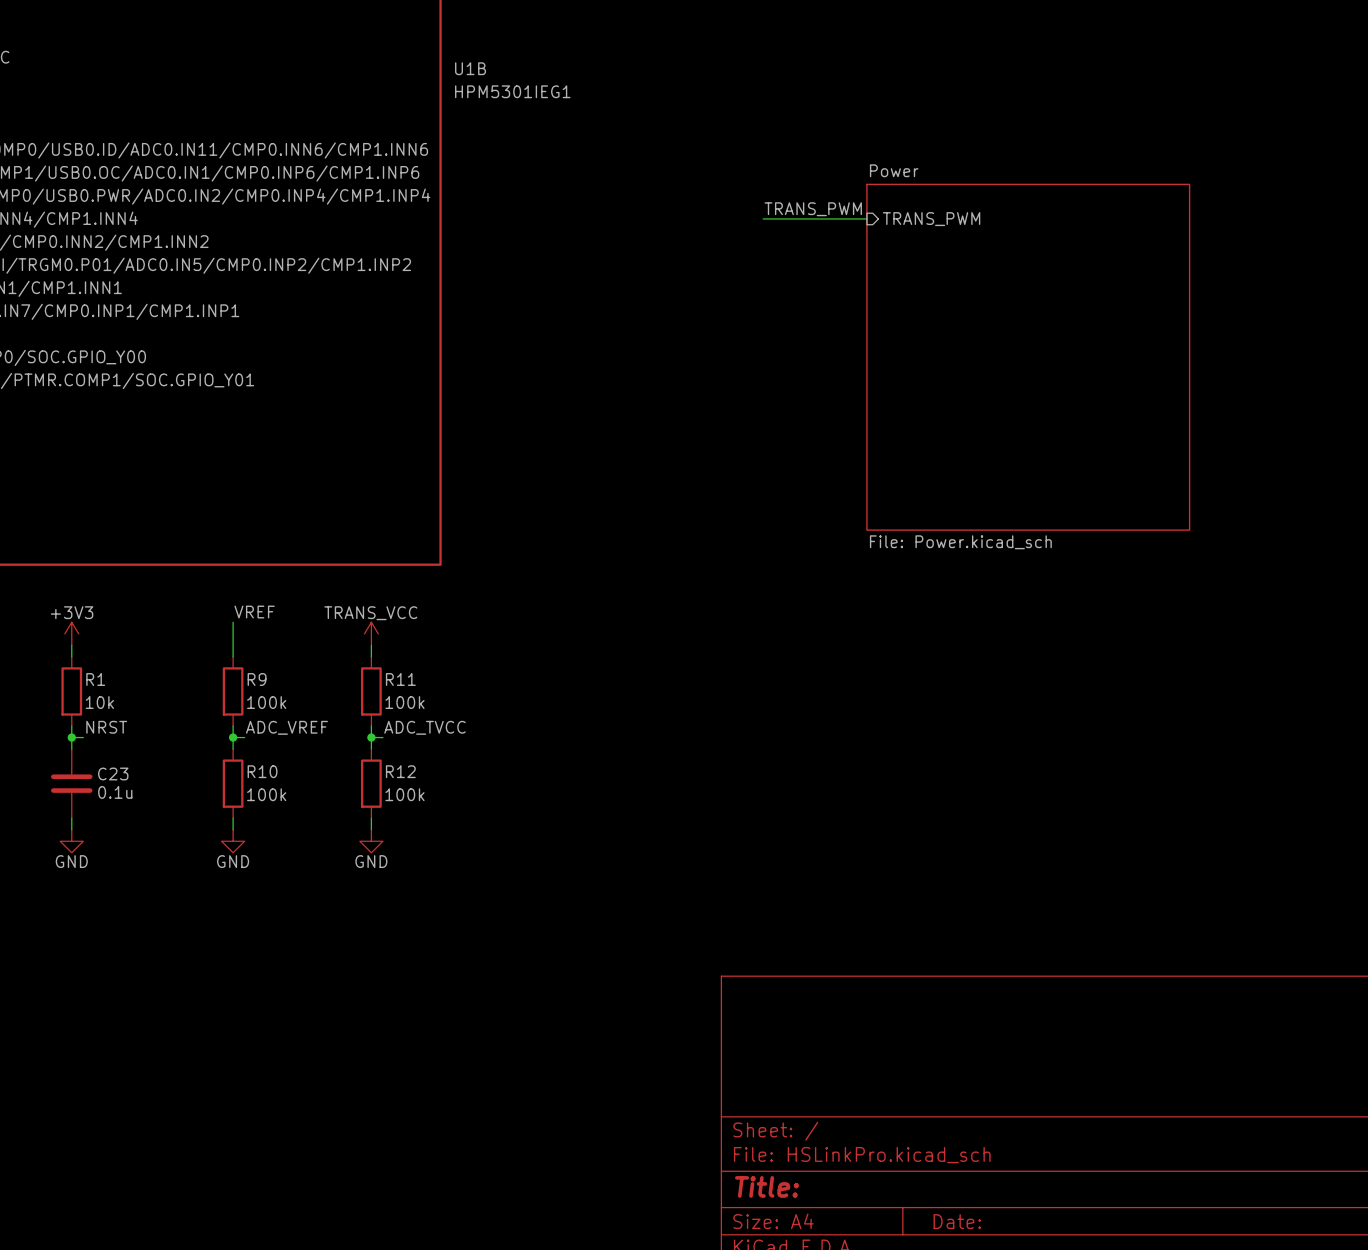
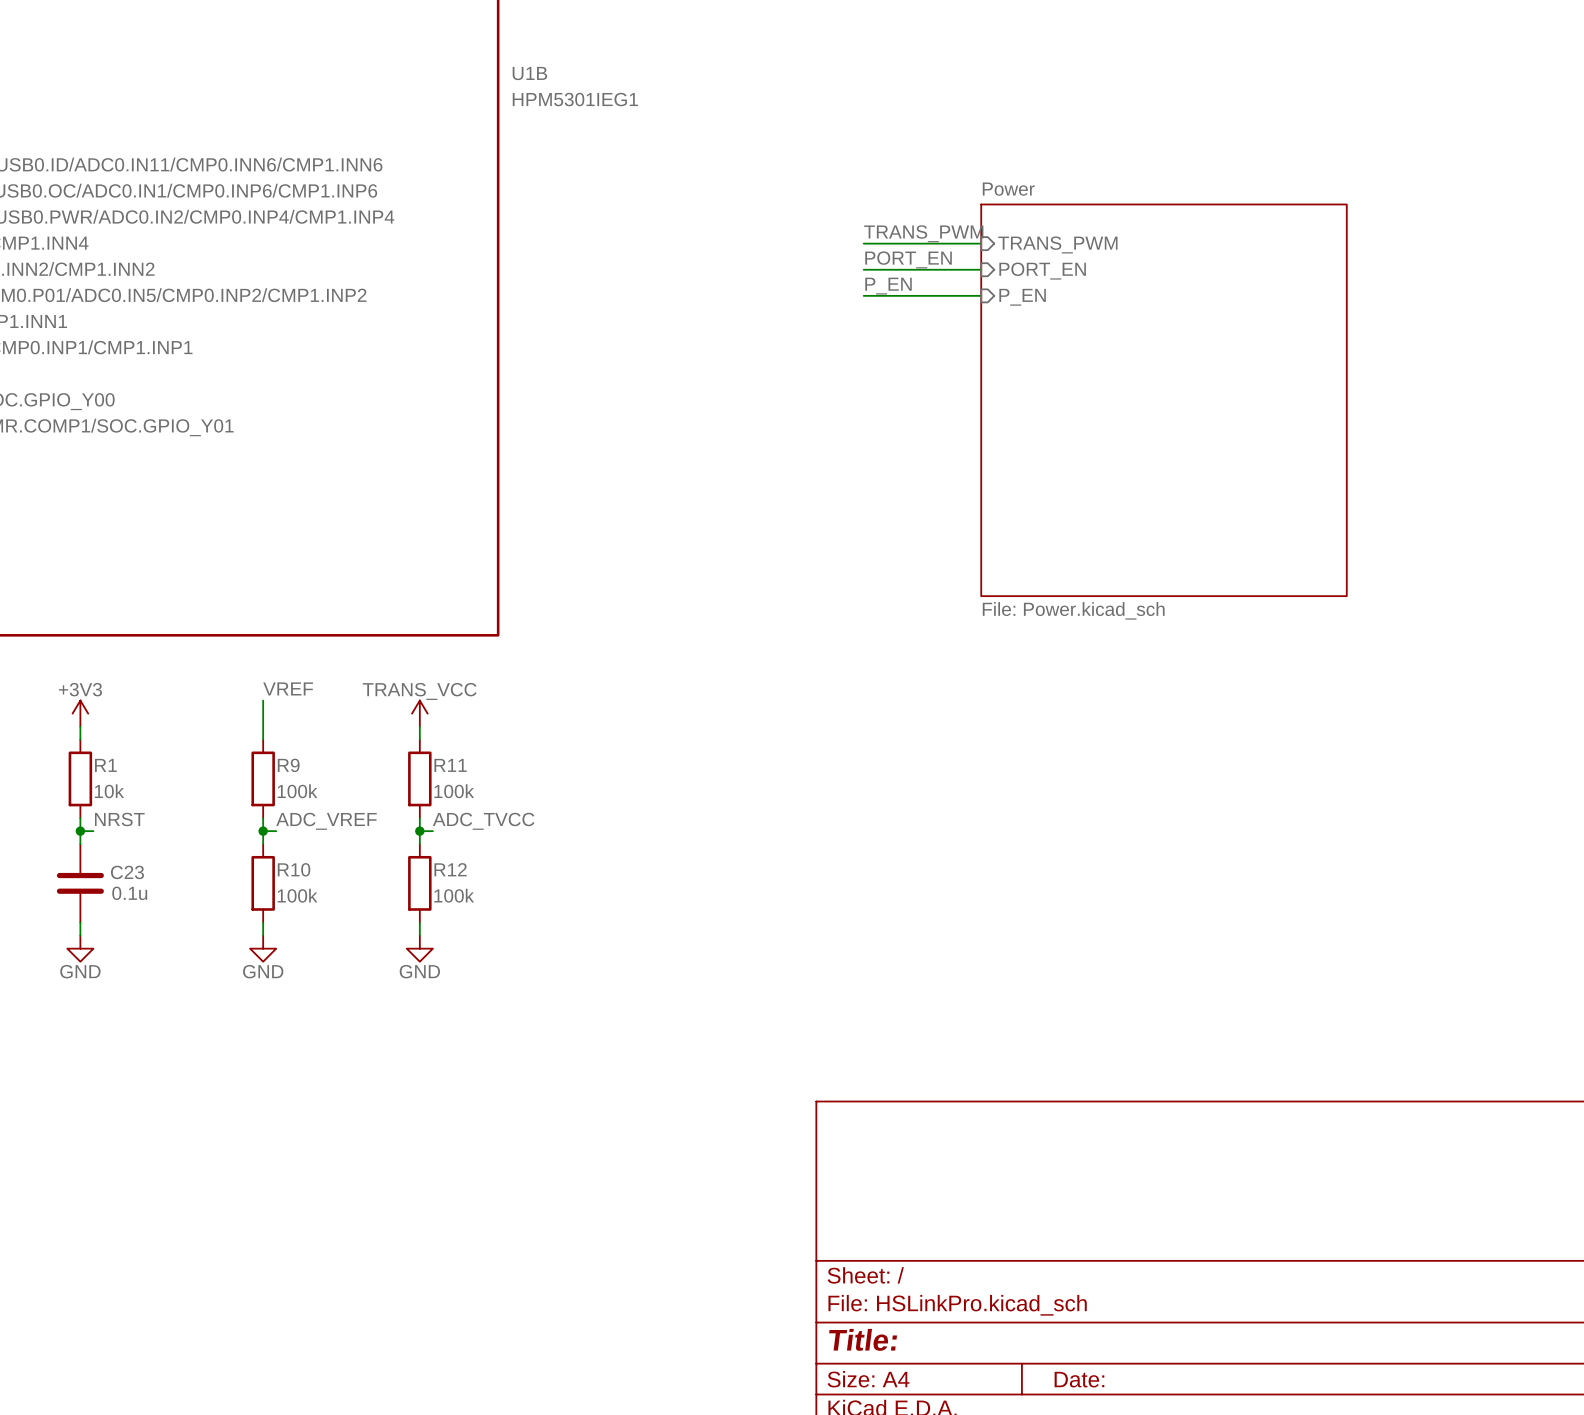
label: none -> PORT_EN (908, 259)
wire: none -> (863, 269) (981, 269)
sheet pin: none -> PORT_EN (1042, 271)
label: none -> P_EN (888, 286)
wire: none -> (863, 295) (981, 295)
sheet pin: none -> P_EN (1022, 297)

